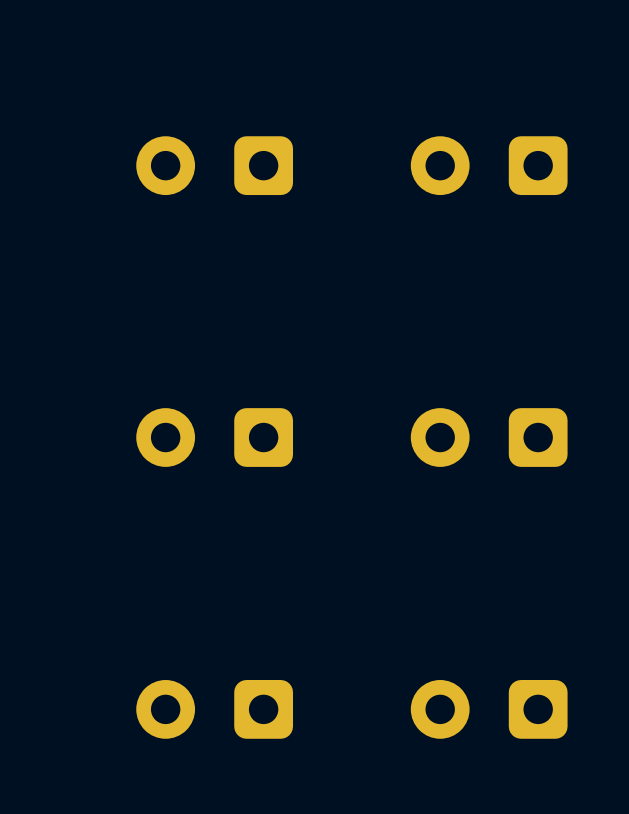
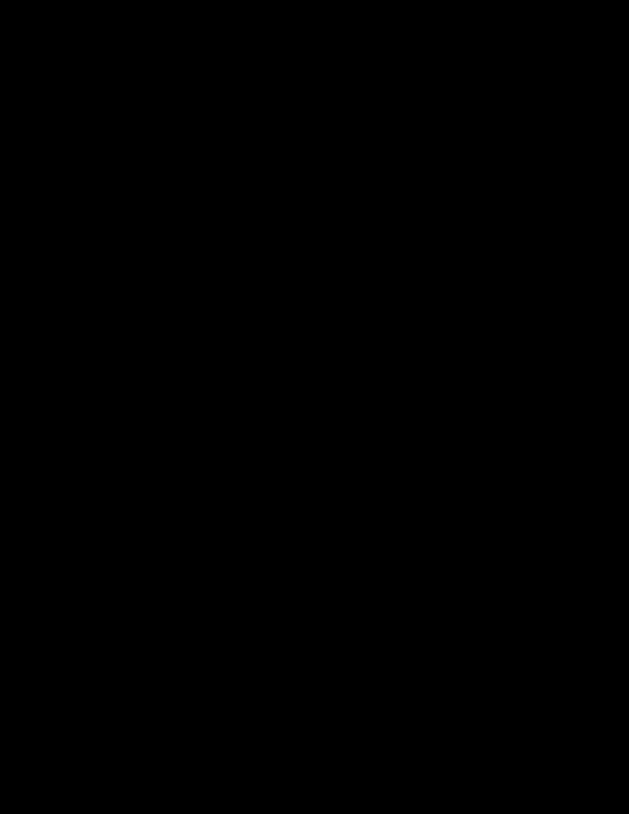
part: (214, 165) -> none
part: (489, 165) -> none
part: (214, 437) -> none
part: (489, 437) -> none
part: (214, 709) -> none
part: (489, 709) -> none

